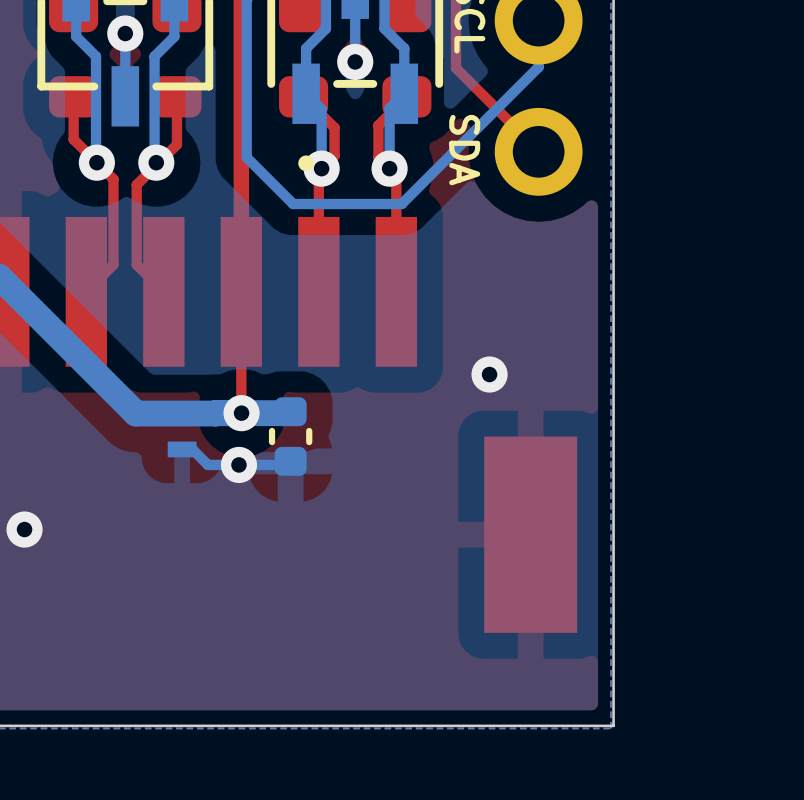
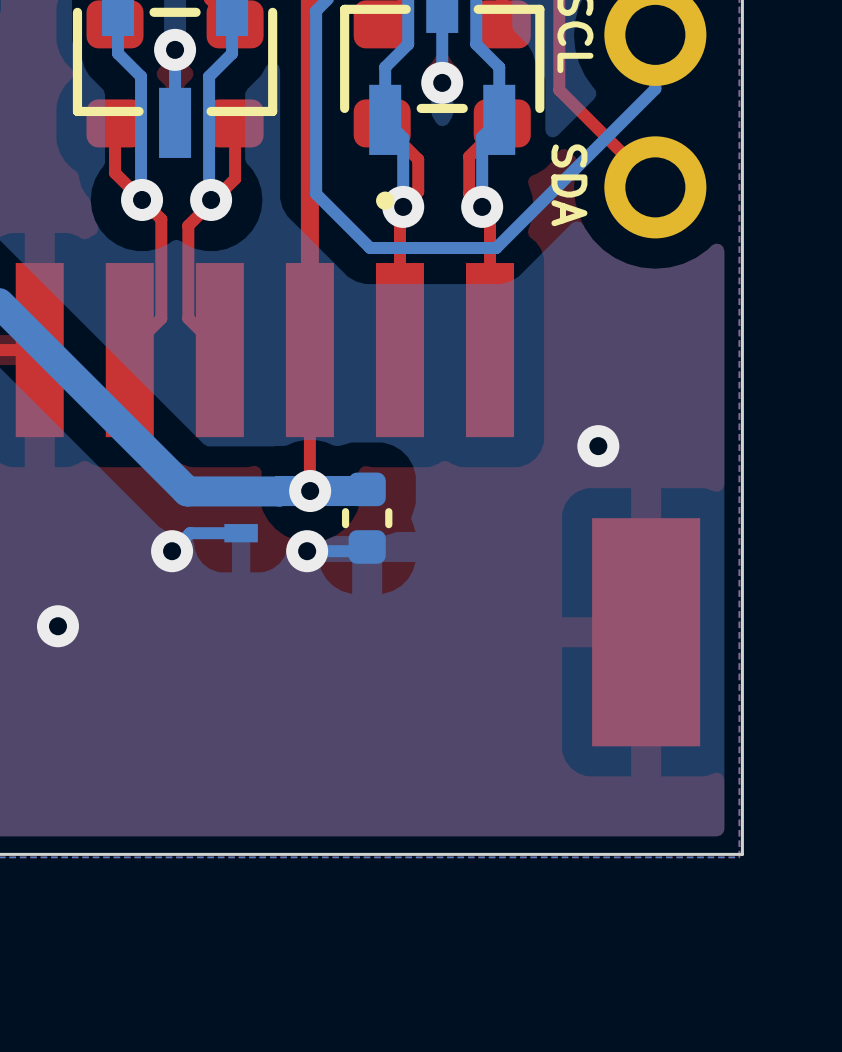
bottom track: (182, 449) (192, 449) (207, 464) (238, 464) -> (241, 533) (190, 533) (172, 551)
via: none -> (172, 551)

